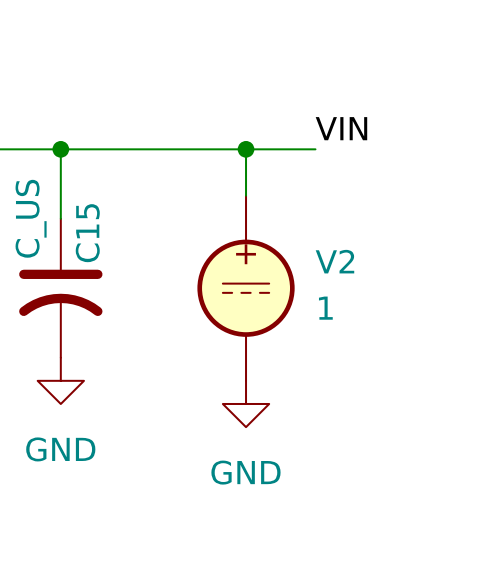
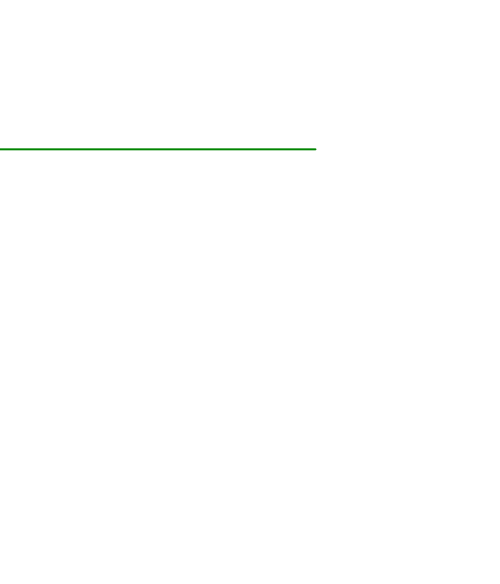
label: VIN (341, 128) -> none
wire: (60, 149) (60, 218) -> none
junction: (60, 149) -> none
wire: (246, 149) (246, 195) -> none
junction: (246, 149) -> none
C15: C_US (60, 288) -> none
V2: 1 (246, 288) -> none
power symbol: GND (60, 380) -> none
power symbol: GND (246, 403) -> none

